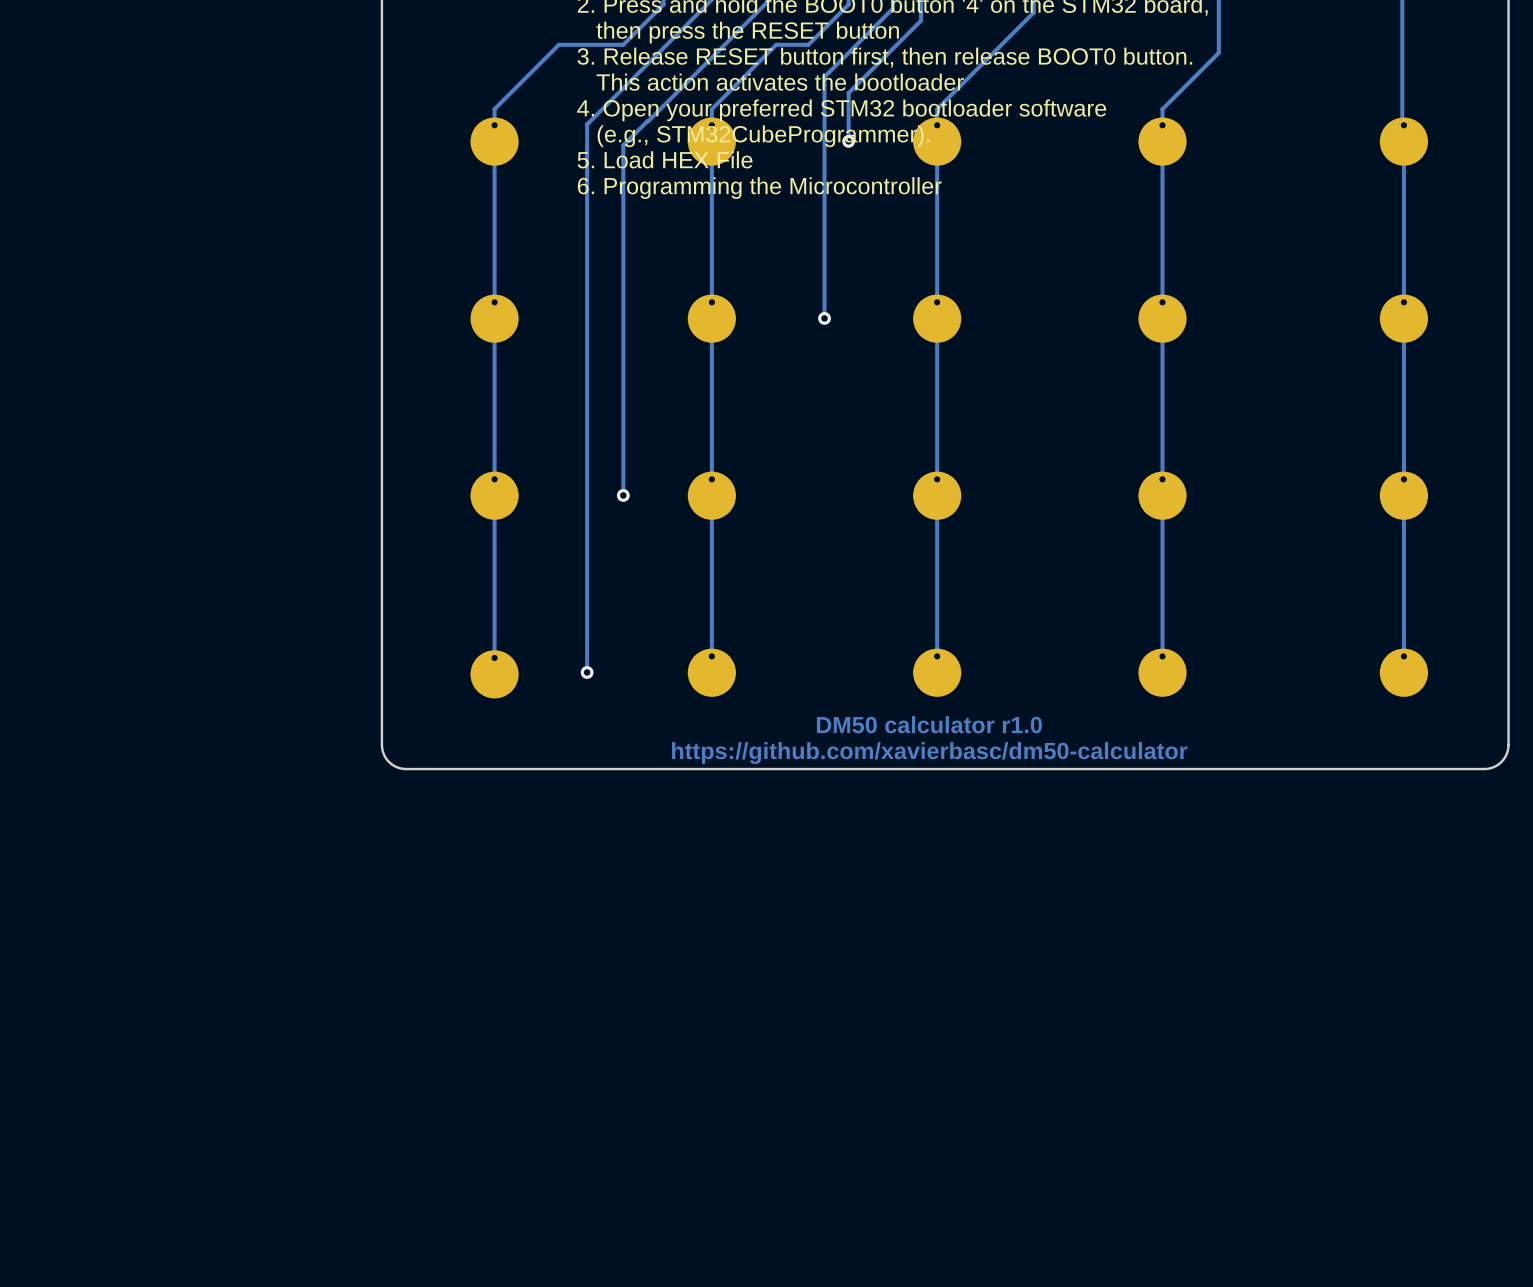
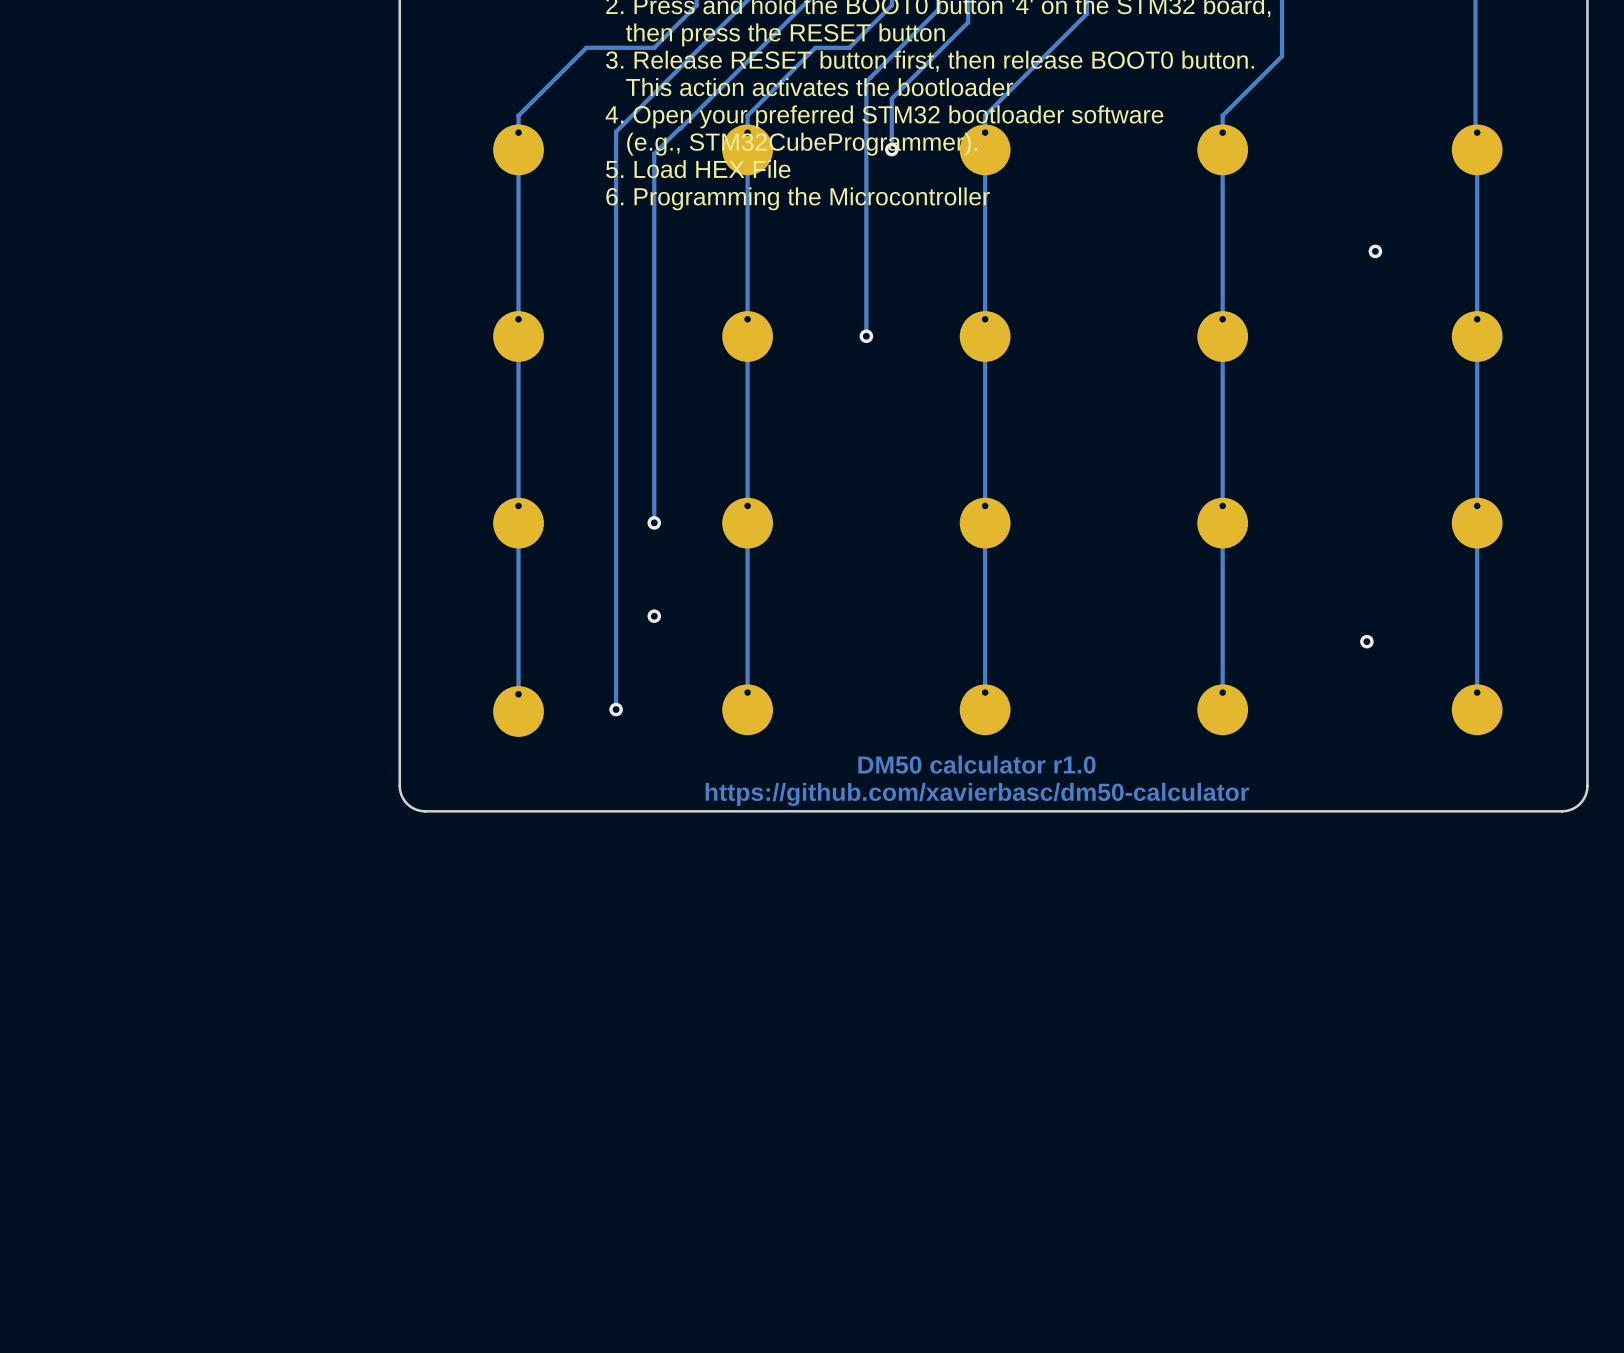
via: none -> (1375, 251)
via: none -> (654, 616)
via: none -> (1366, 641)

